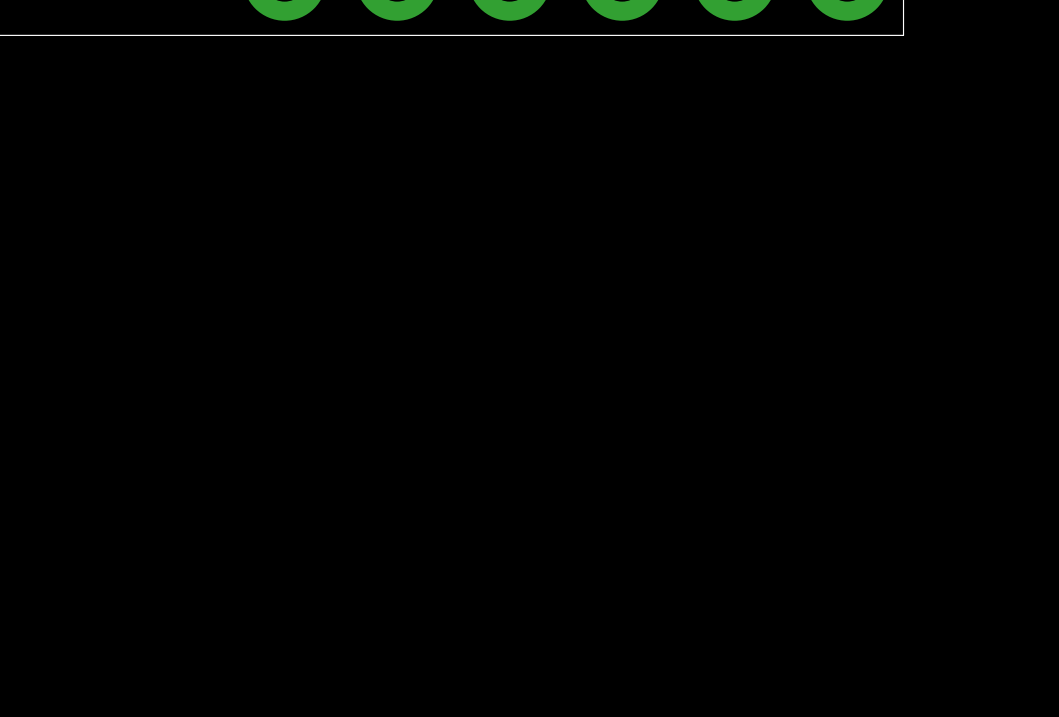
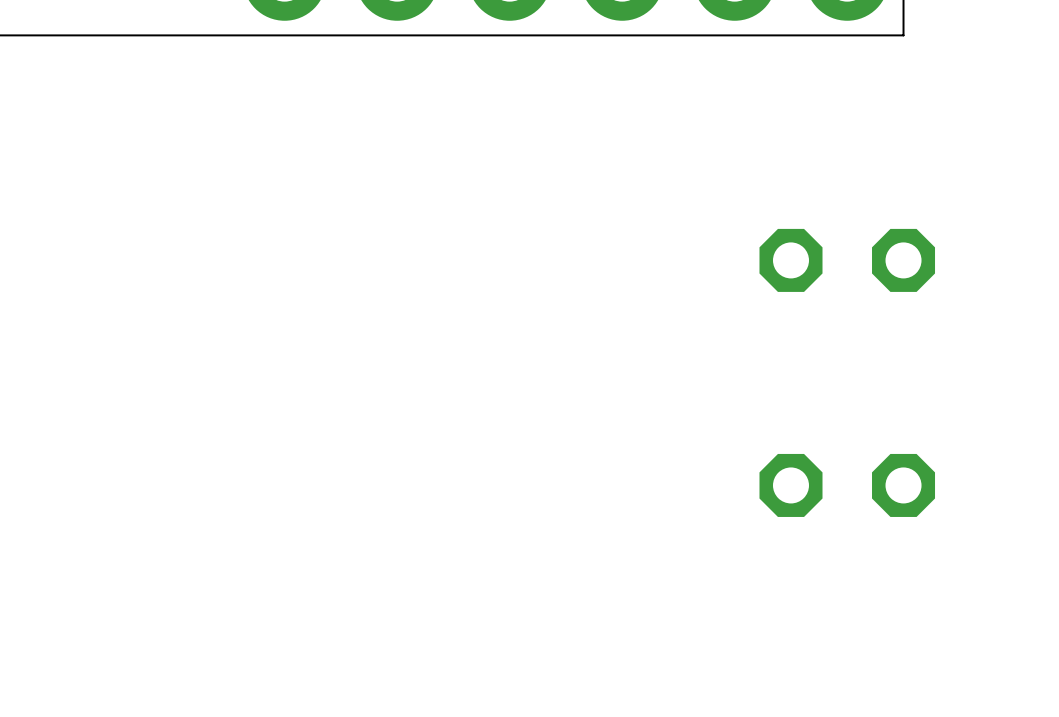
part: none -> (847, 260)
part: none -> (847, 485)

